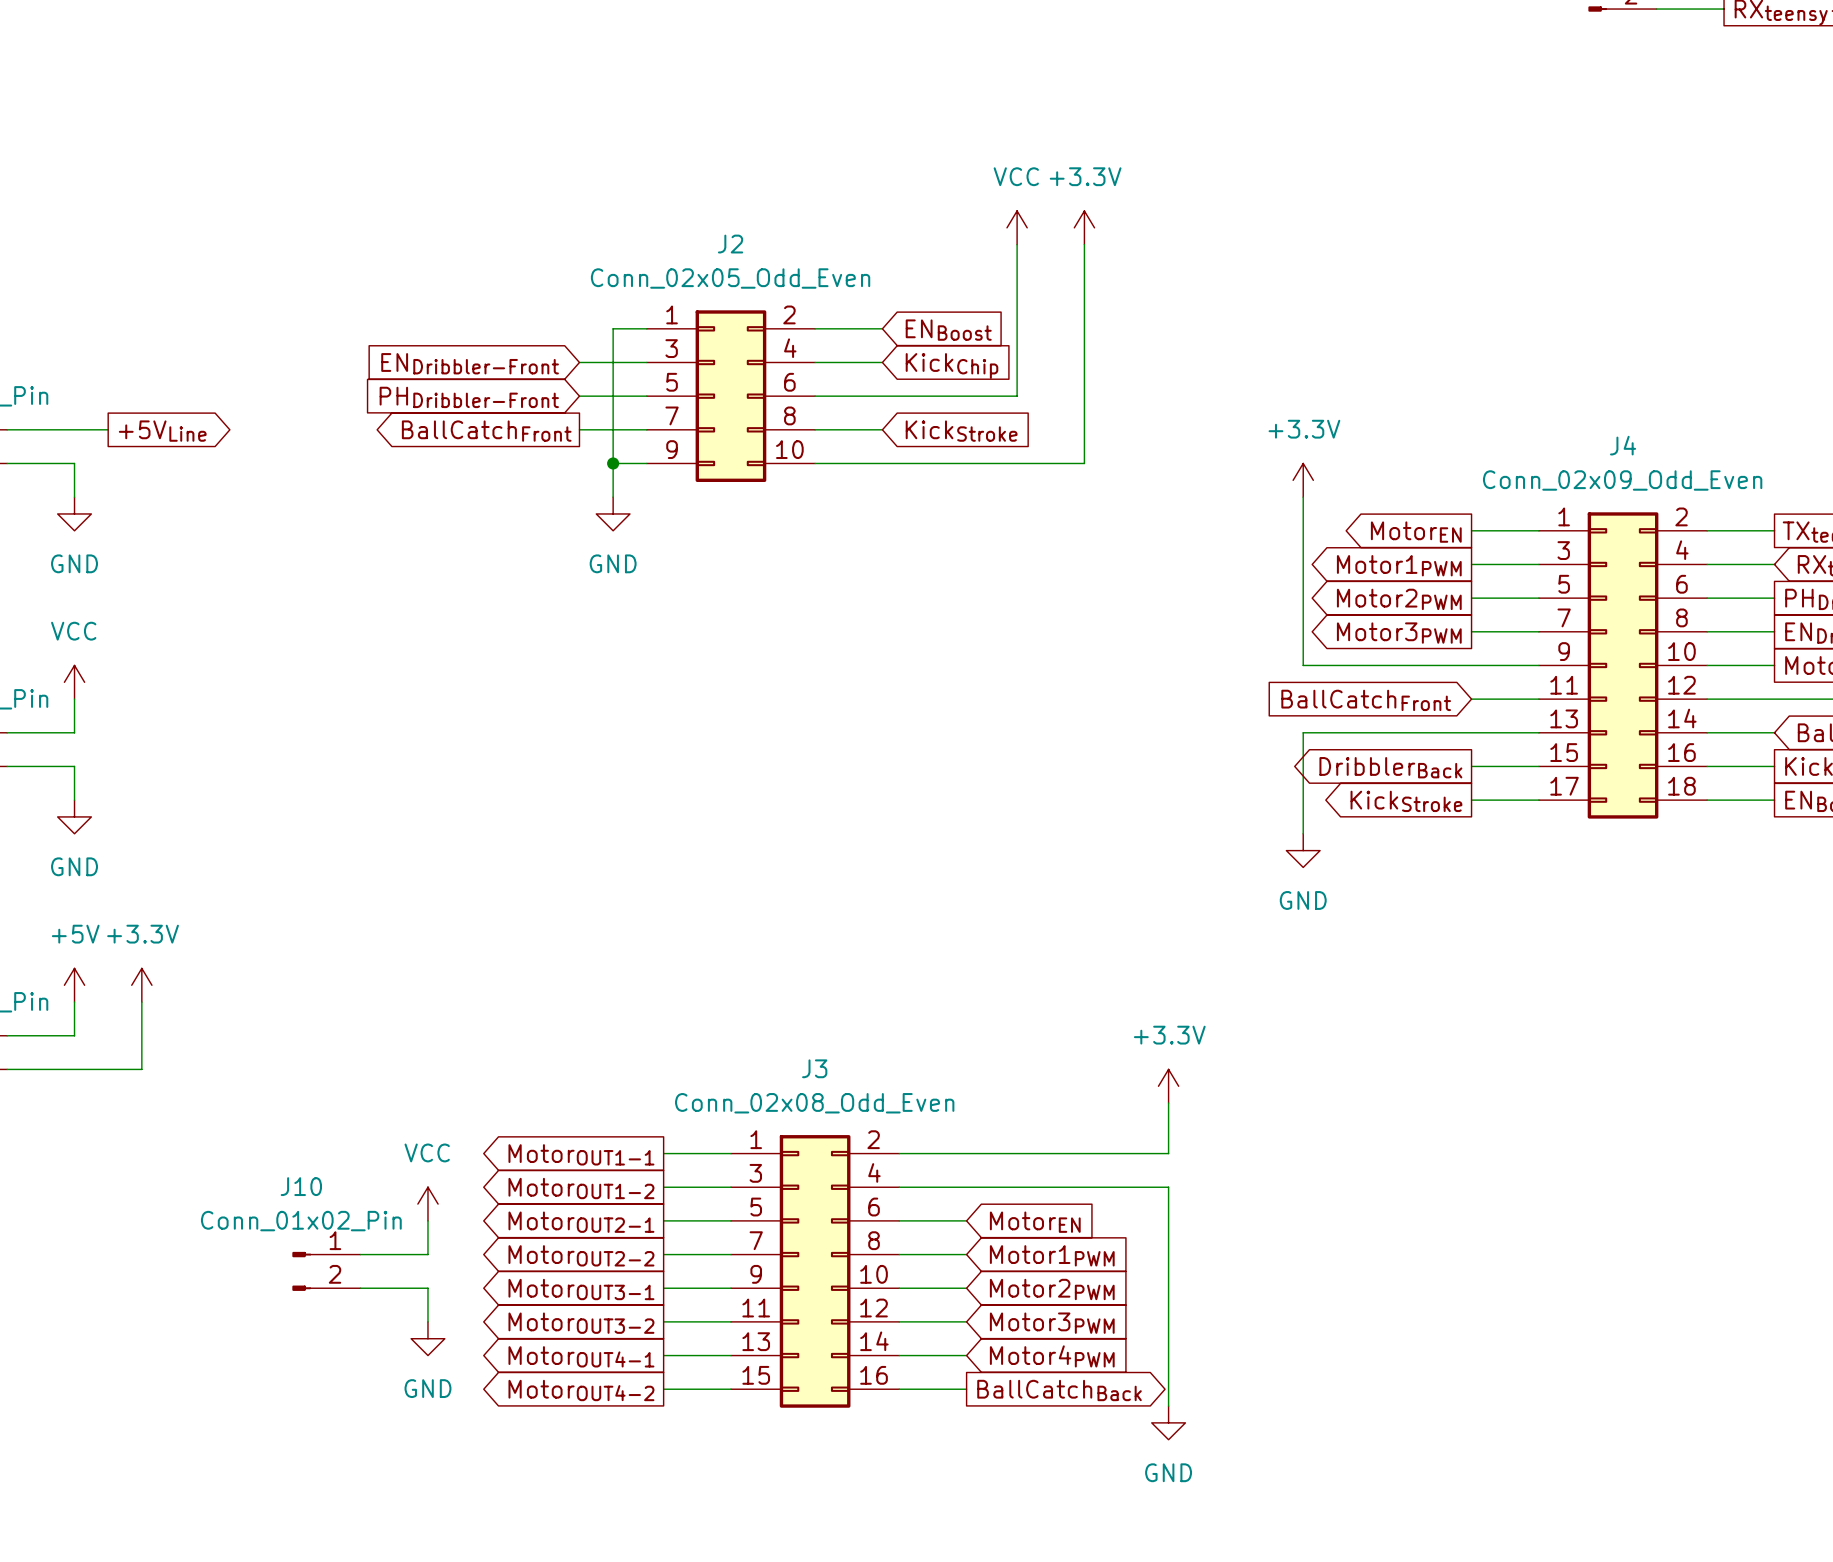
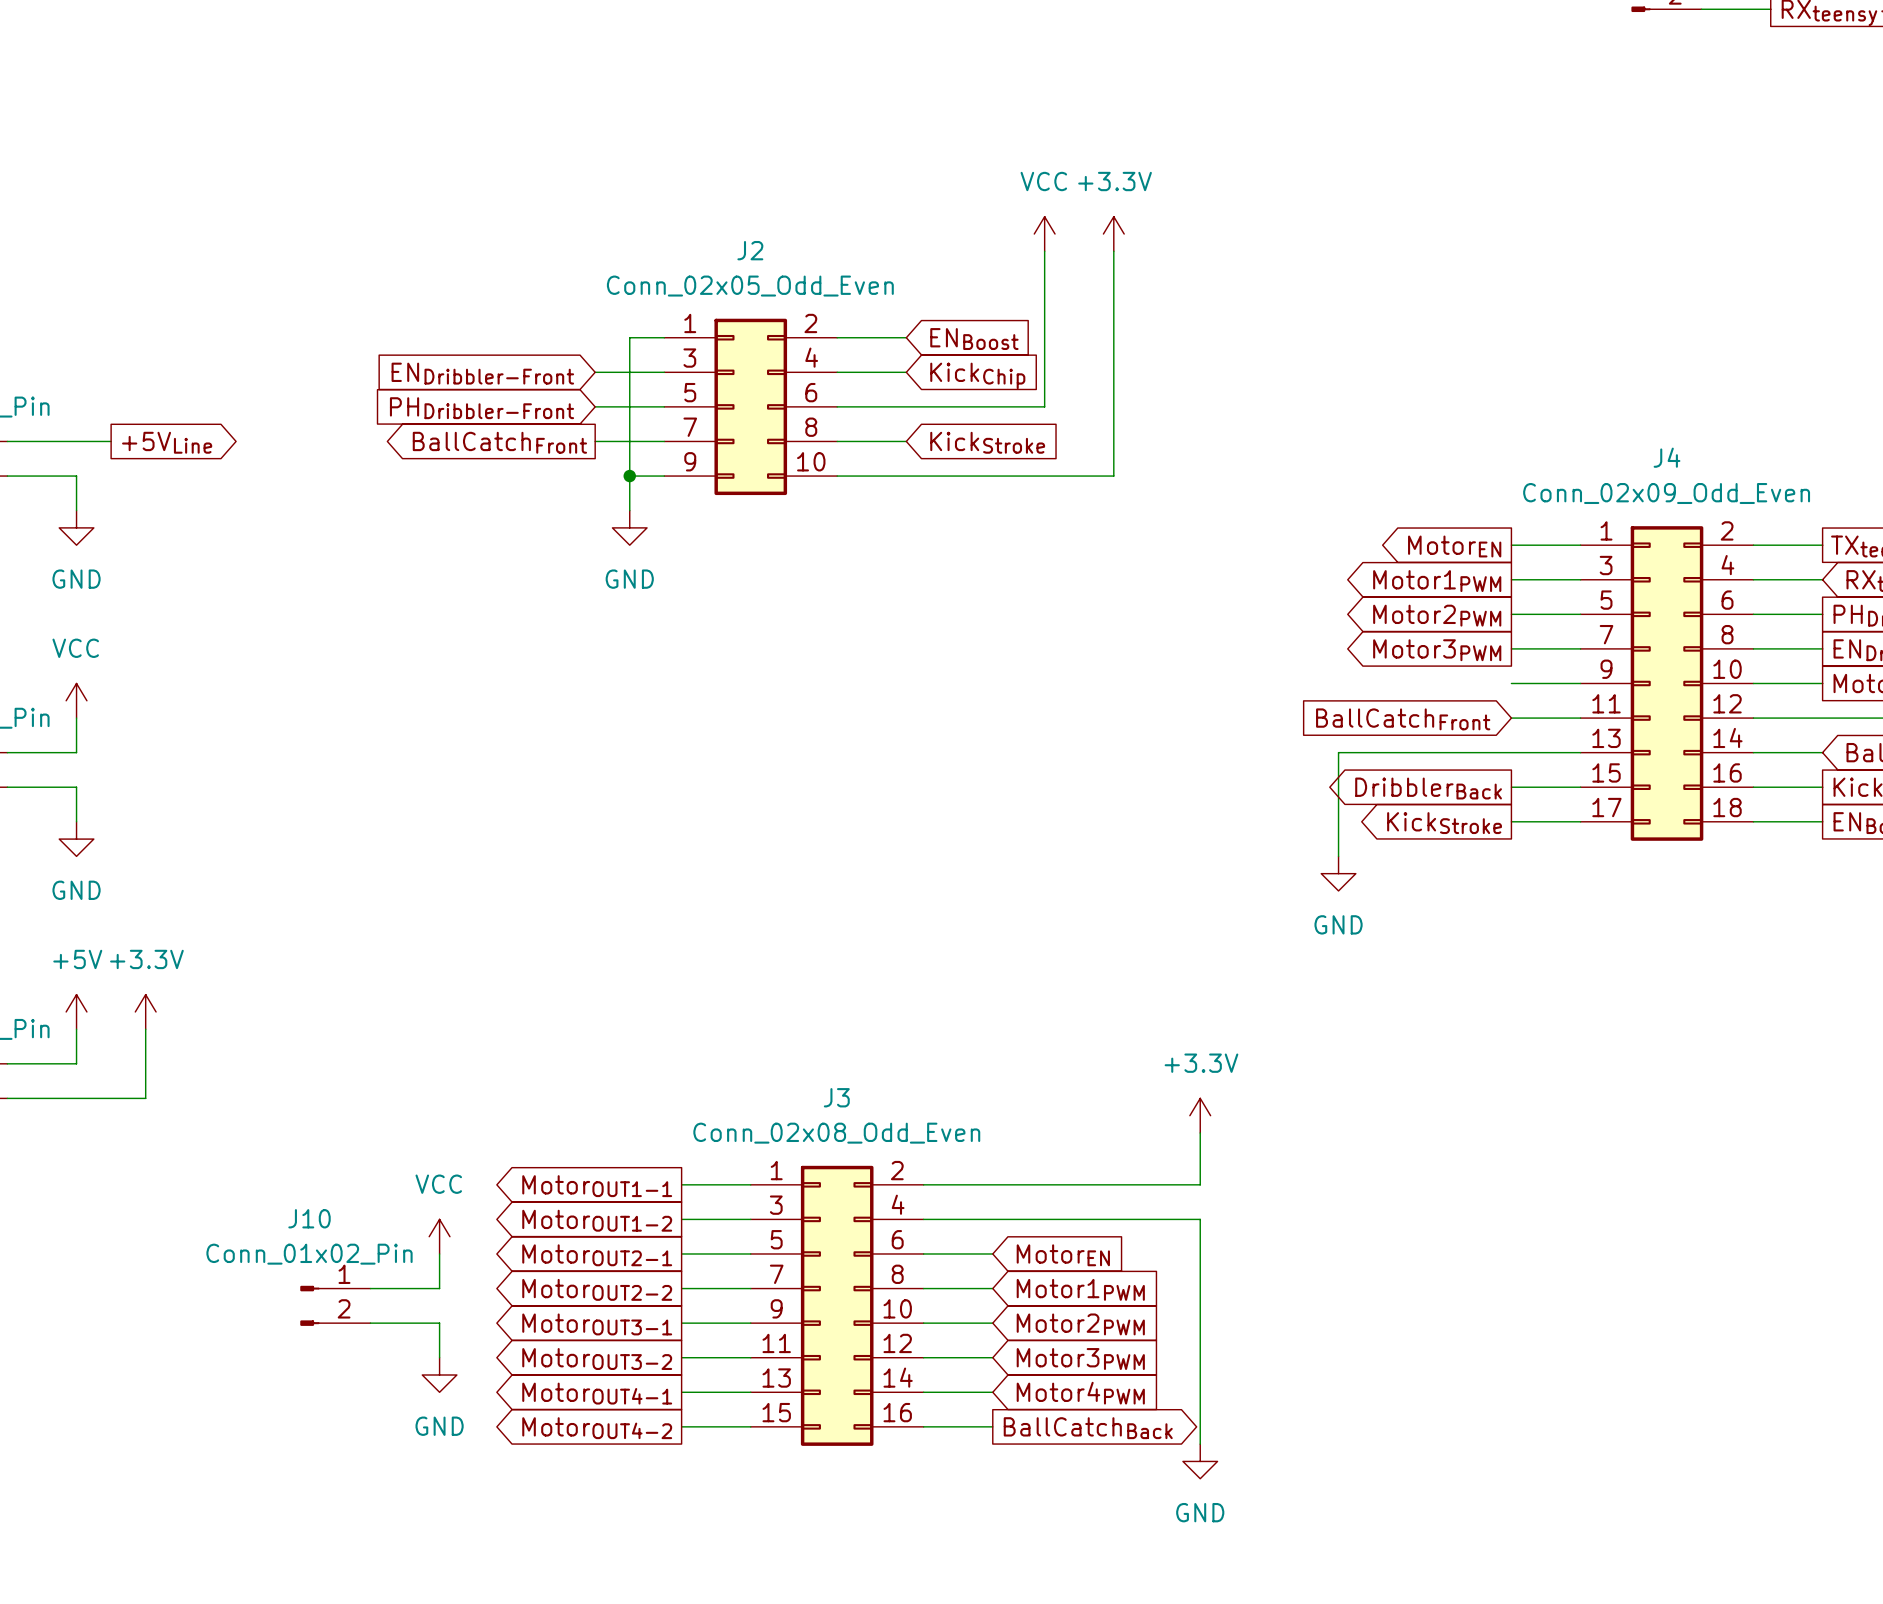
power symbol: +3.3V (1303, 480) -> none
wire: (1303, 497) (1303, 665) (1471, 665) -> none

